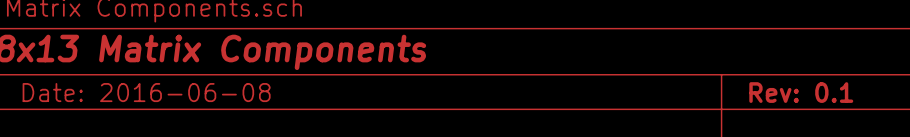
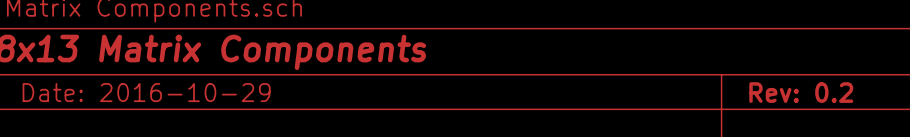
title block: Date: 2016-06-08 (146, 92) -> Date: 2016-10-29 (146, 92)
title block: Rev: 0.1 (801, 92) -> Rev: 0.2 (801, 92)

